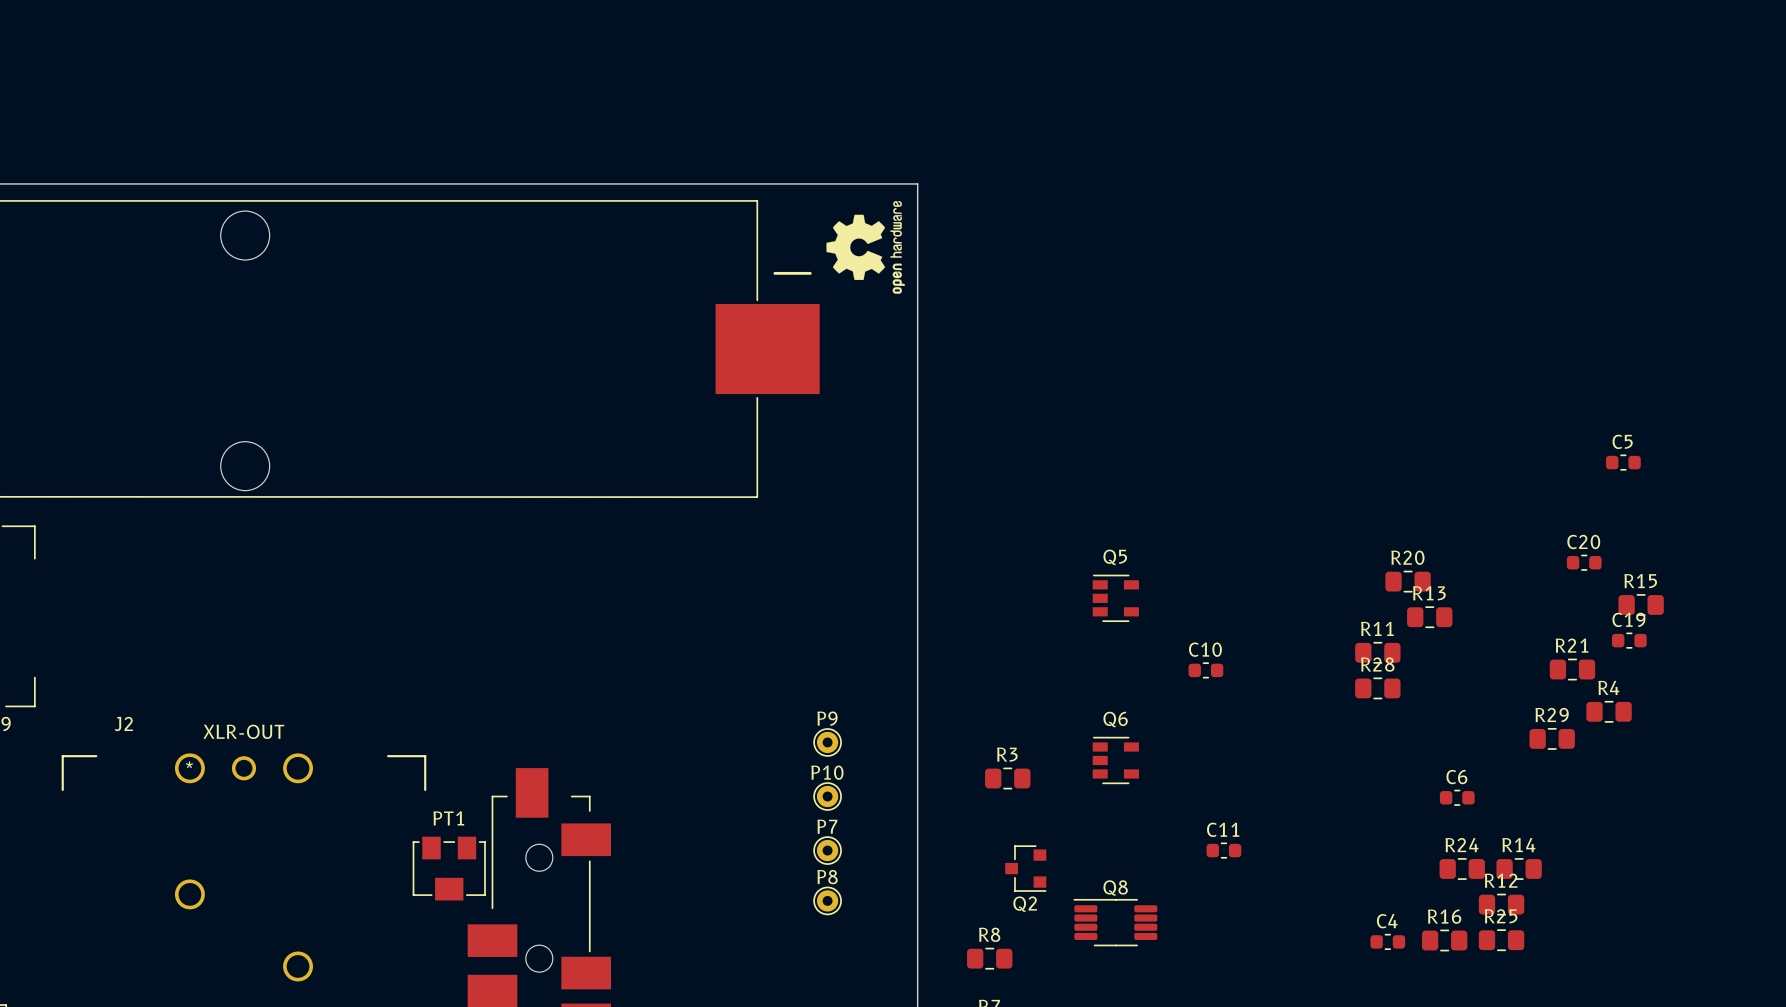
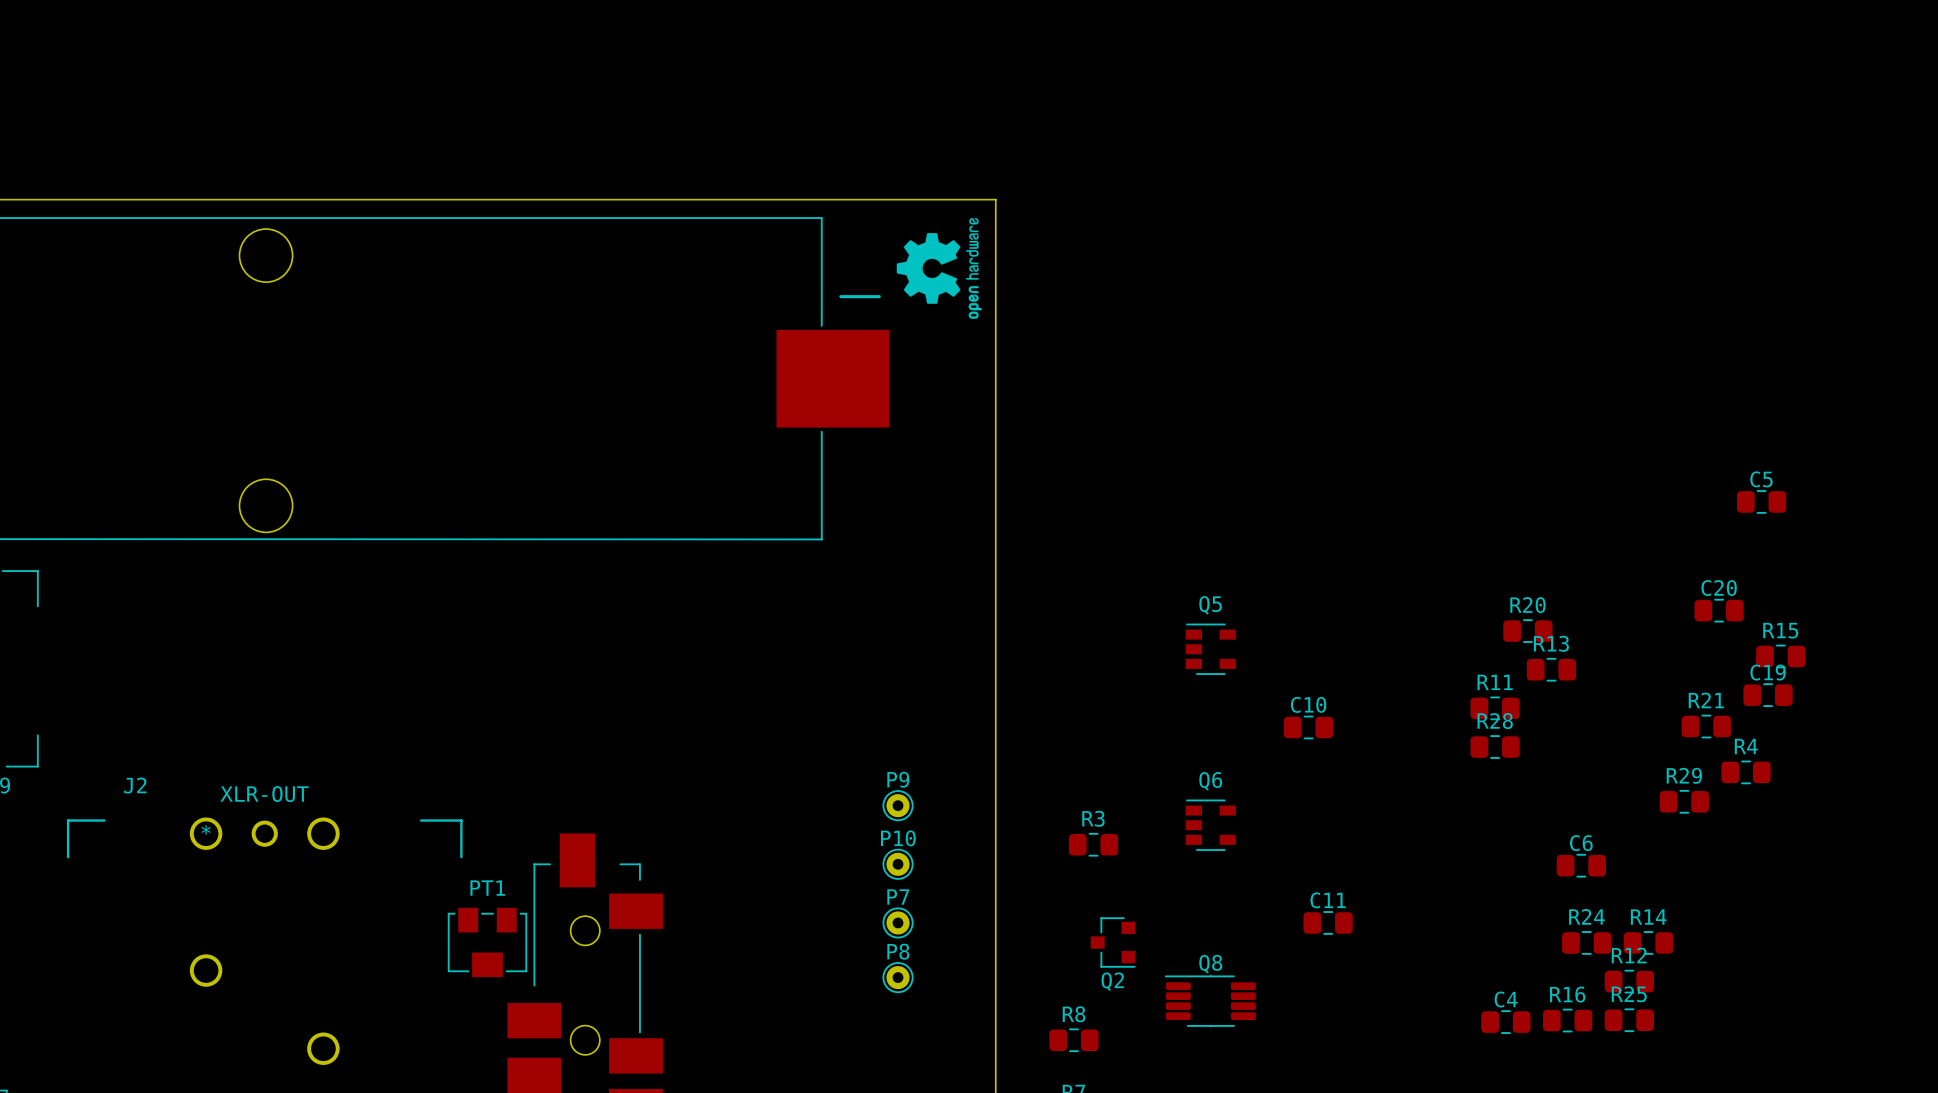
C5 footprint: [1606, 454, 1641, 471] -> [1736, 490, 1787, 514]
C20 footprint: [1566, 554, 1602, 571] -> [1694, 598, 1744, 623]
C19 footprint: [1611, 632, 1647, 649] -> [1743, 683, 1793, 707]
C10 footprint: [1188, 662, 1224, 679] -> [1283, 715, 1334, 740]
C6 footprint: [1439, 789, 1475, 806] -> [1556, 853, 1606, 878]
C11 footprint: [1206, 842, 1242, 859] -> [1303, 911, 1353, 935]
C4 footprint: [1370, 933, 1406, 951] -> [1481, 1010, 1531, 1034]

